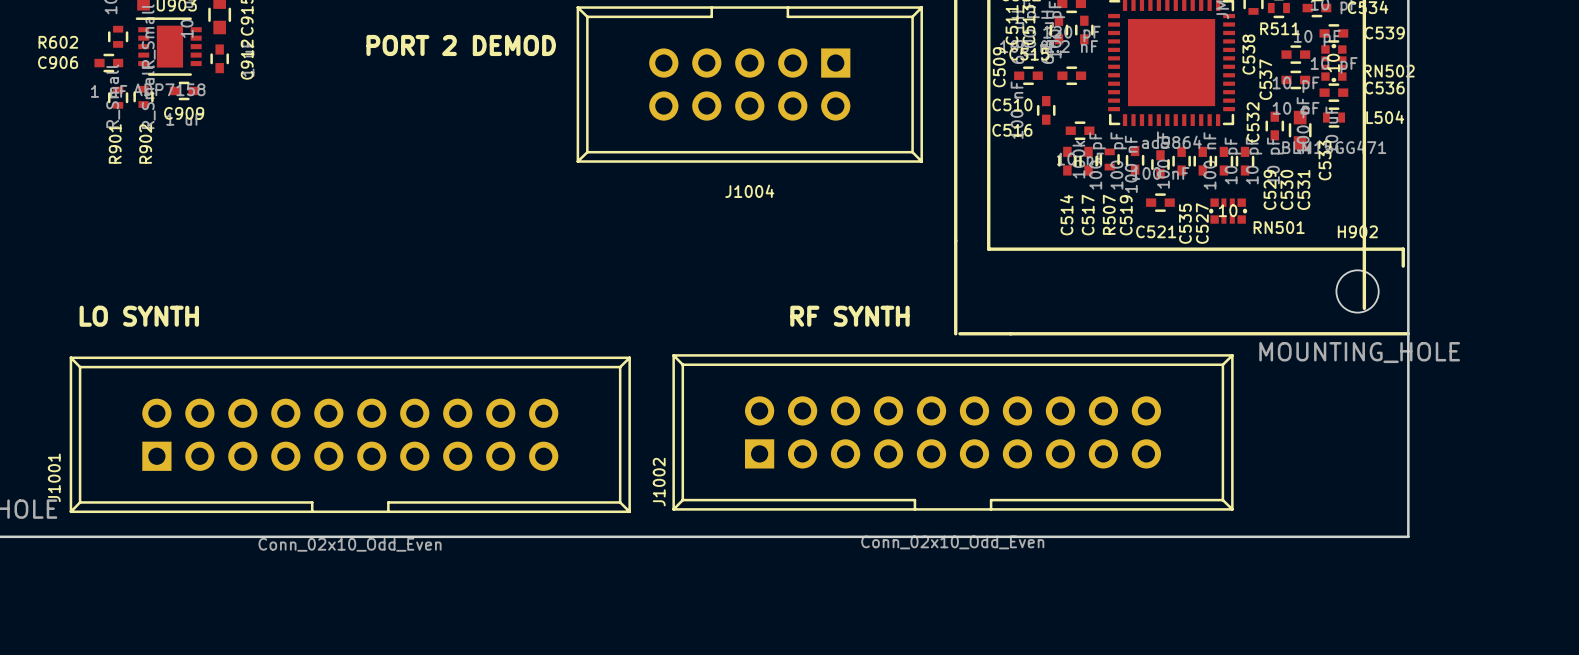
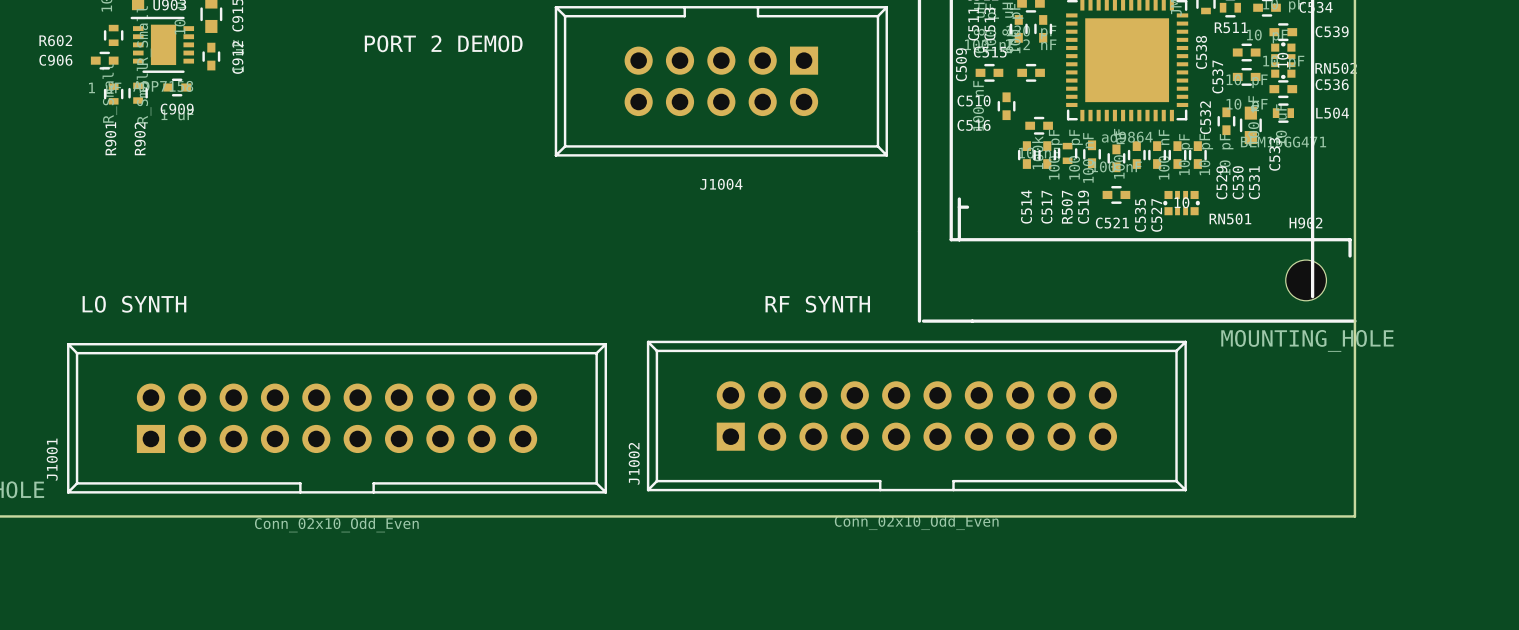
line: none -> (959, 199) (959, 239)
line: none -> (959, 207) (967, 207)

